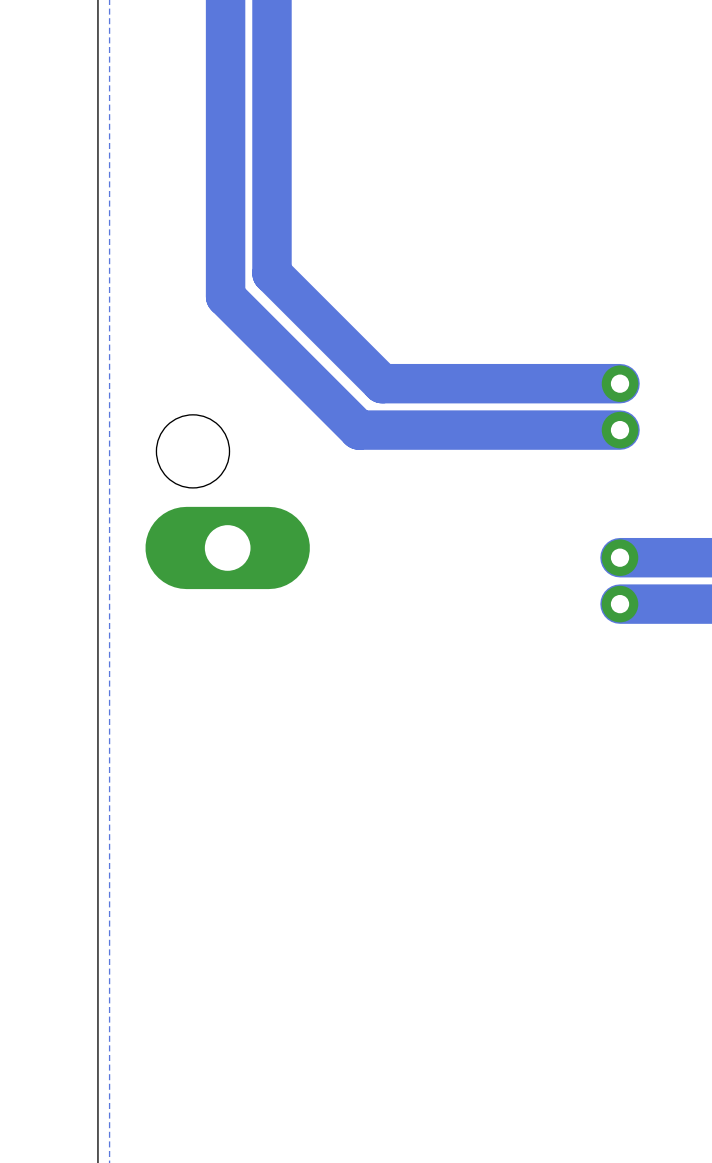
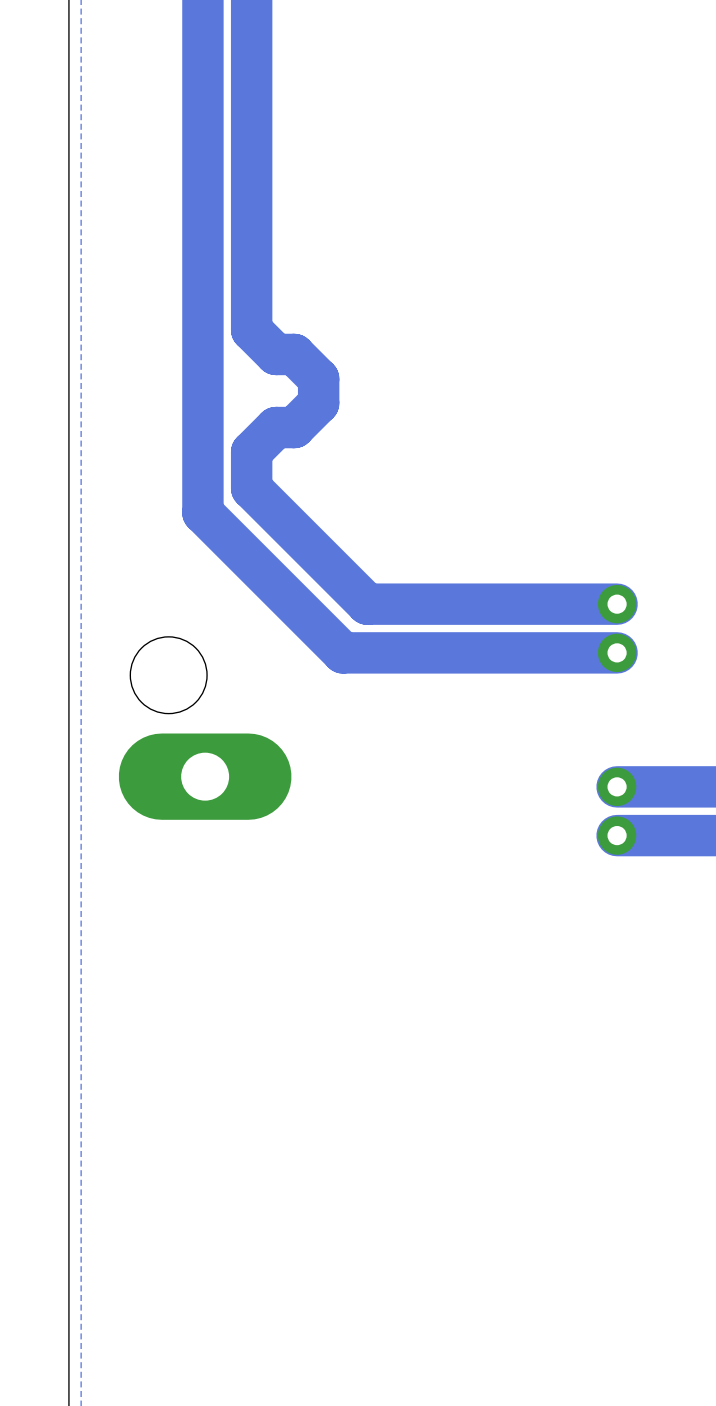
track: (271, 122) (271, 238) -> (251, 330) (276, 354) (294, 354) (318, 378) (318, 403) (294, 427) (276, 427) (251, 451)

